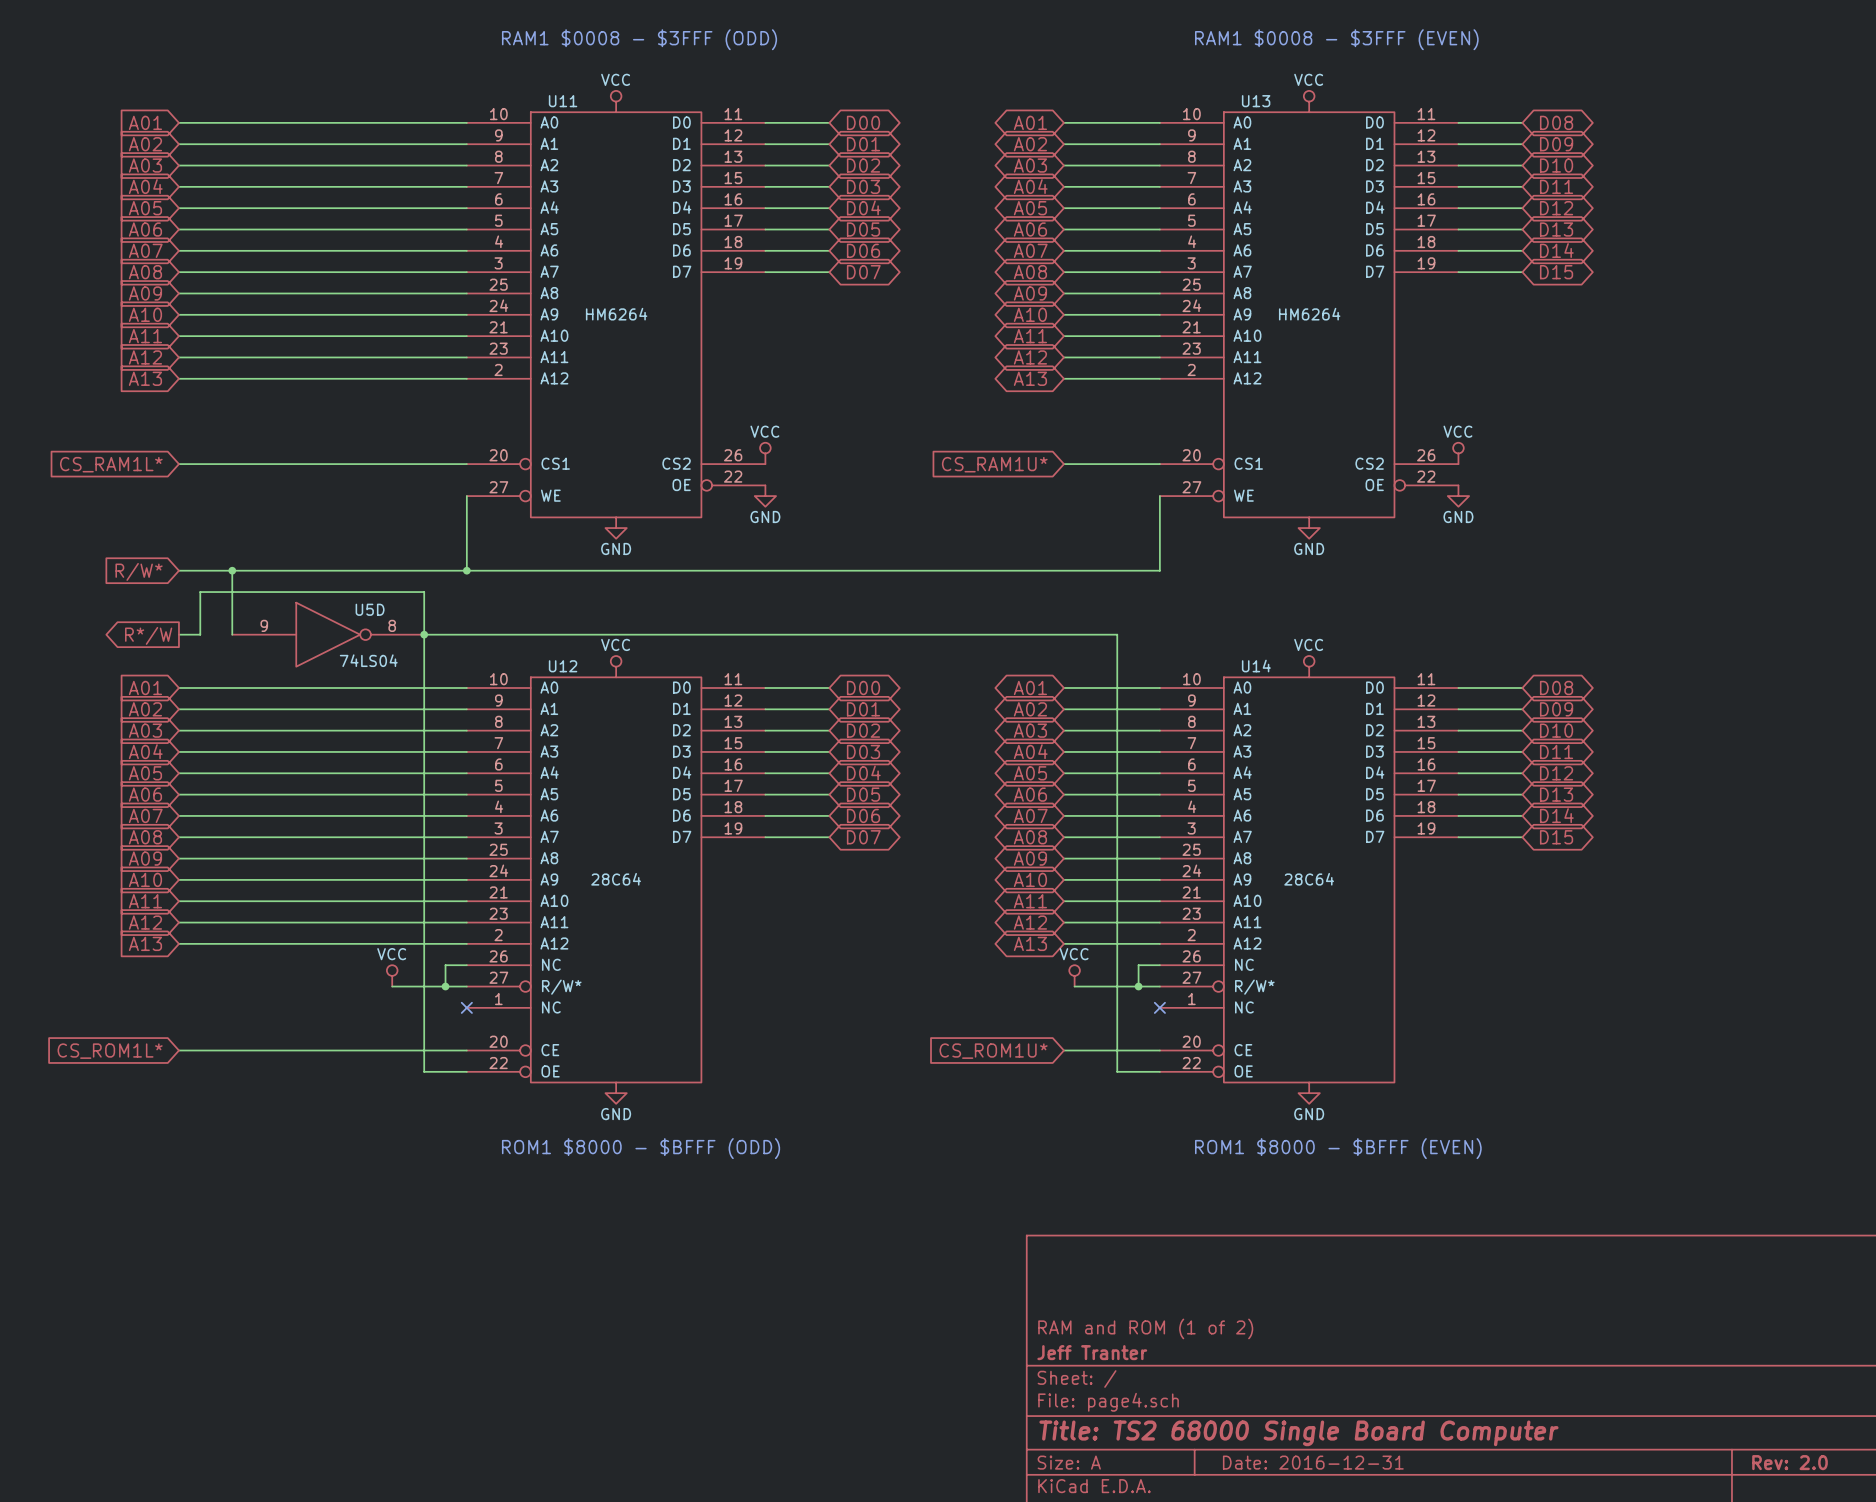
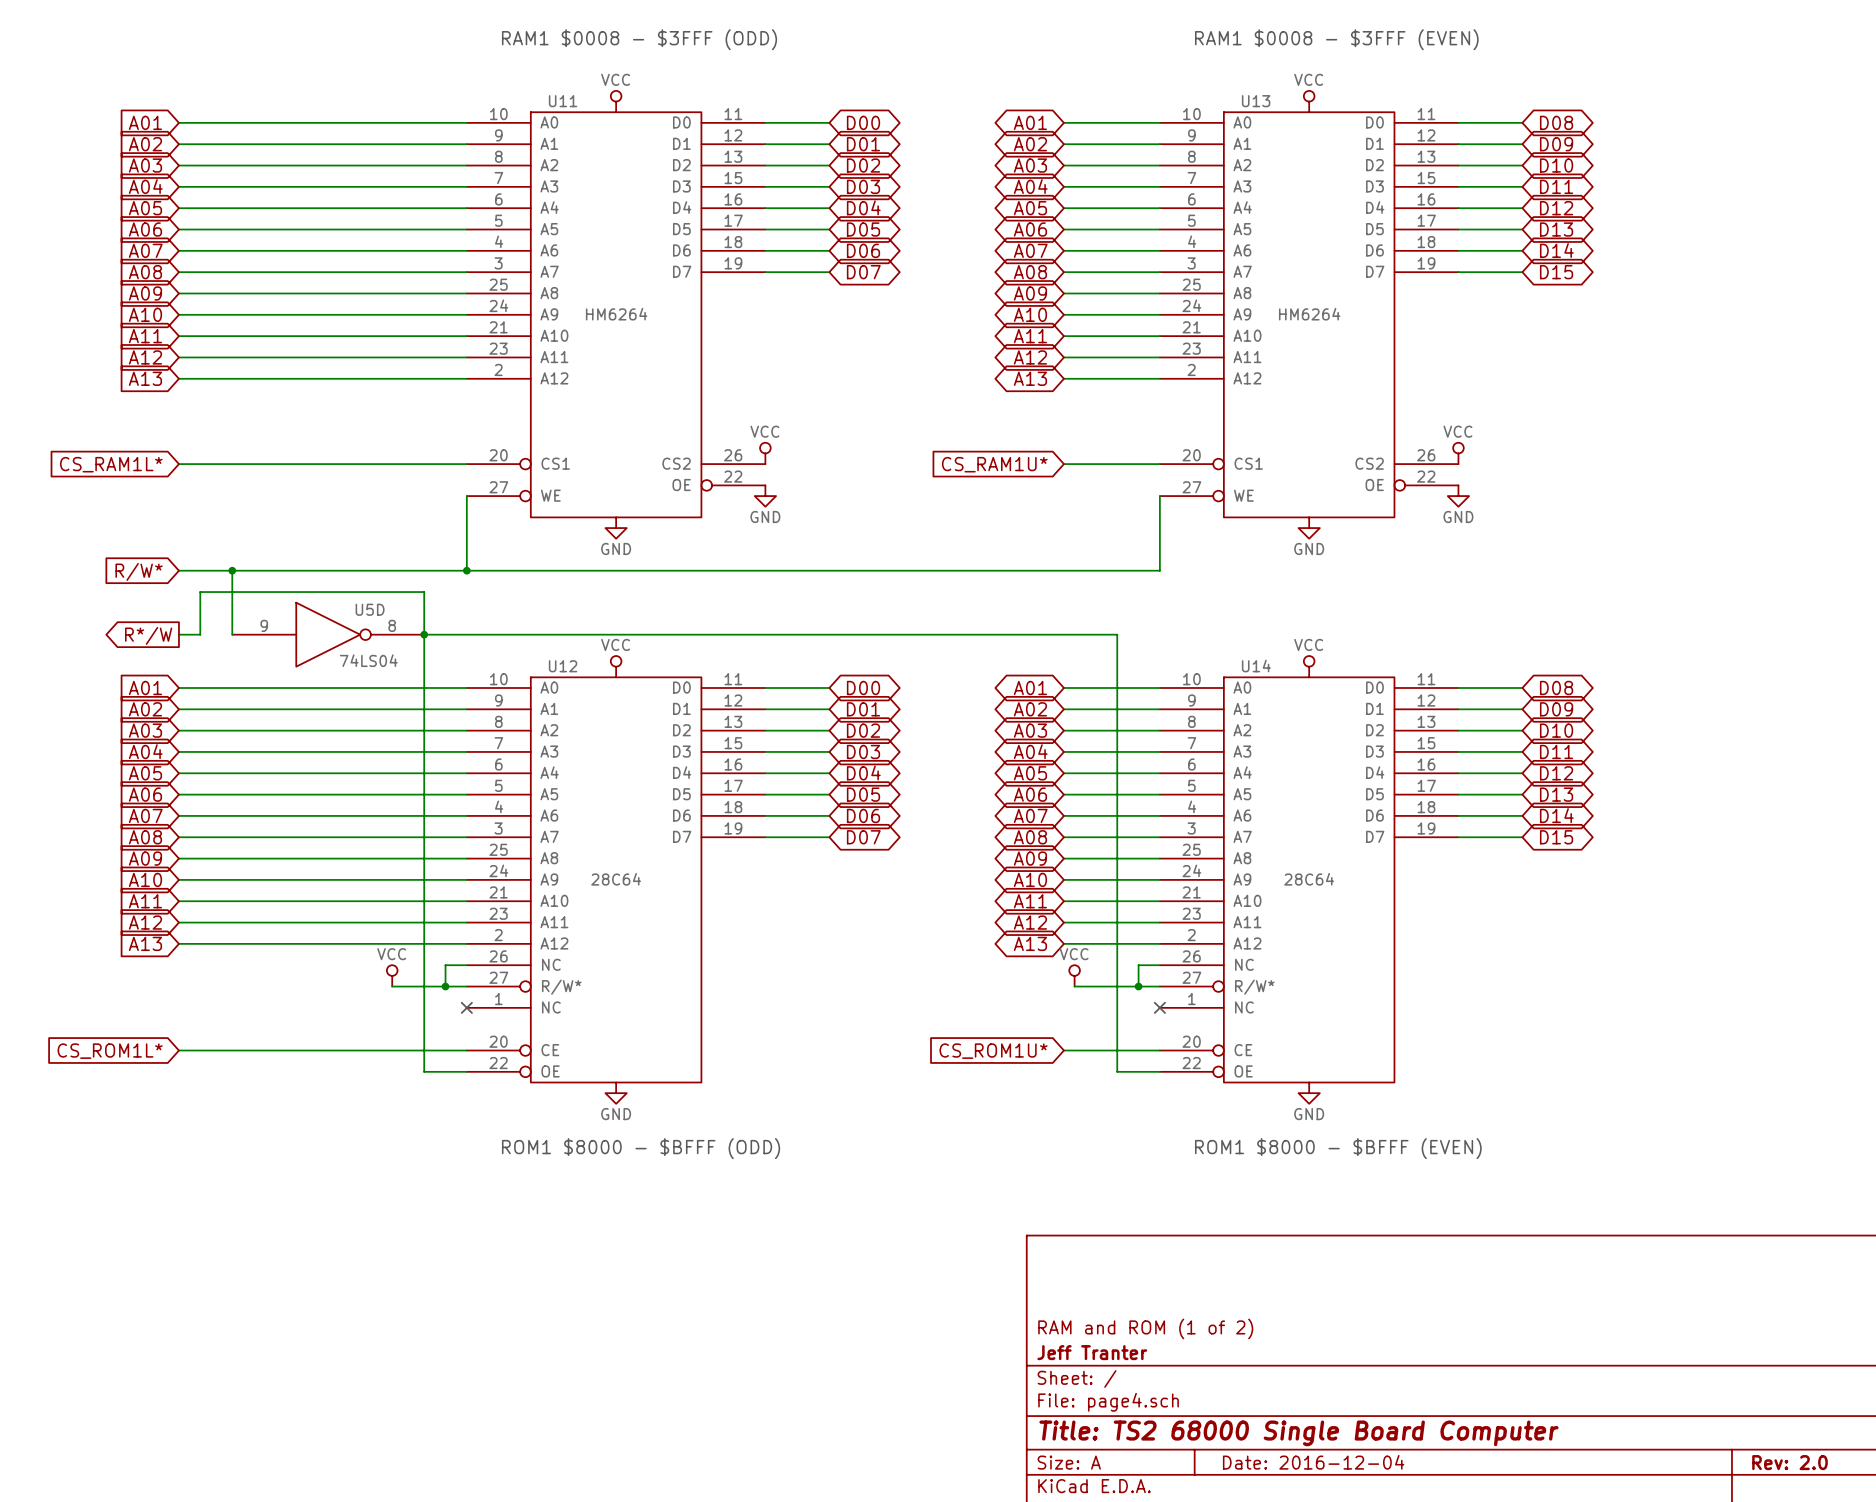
title block: Date: 2016-12-31 (1313, 1462) -> Date: 2016-12-04 (1313, 1462)

